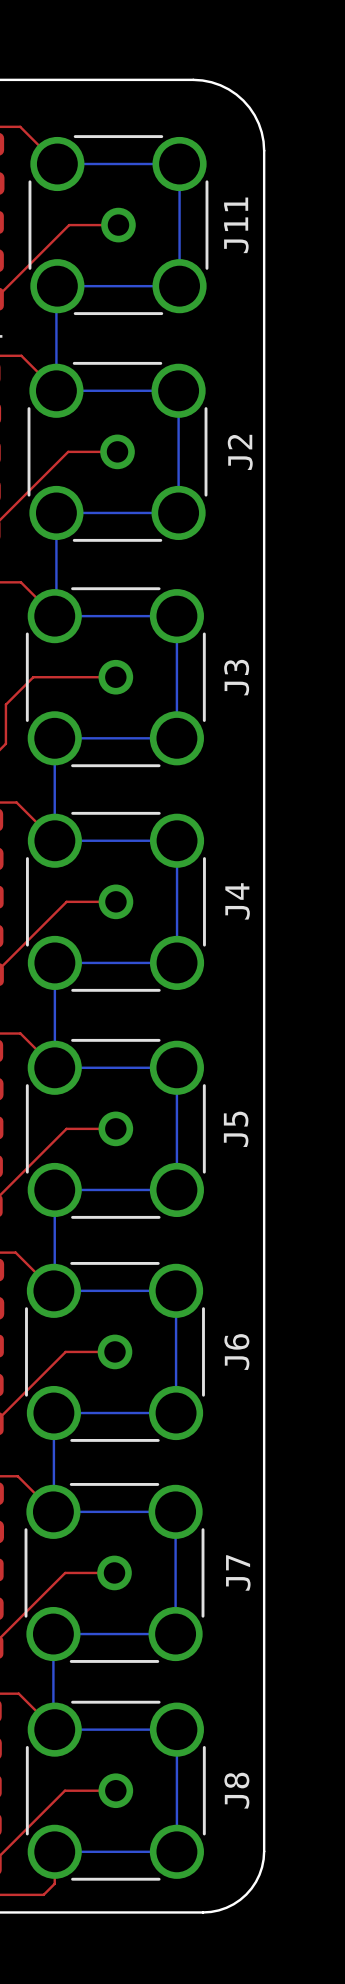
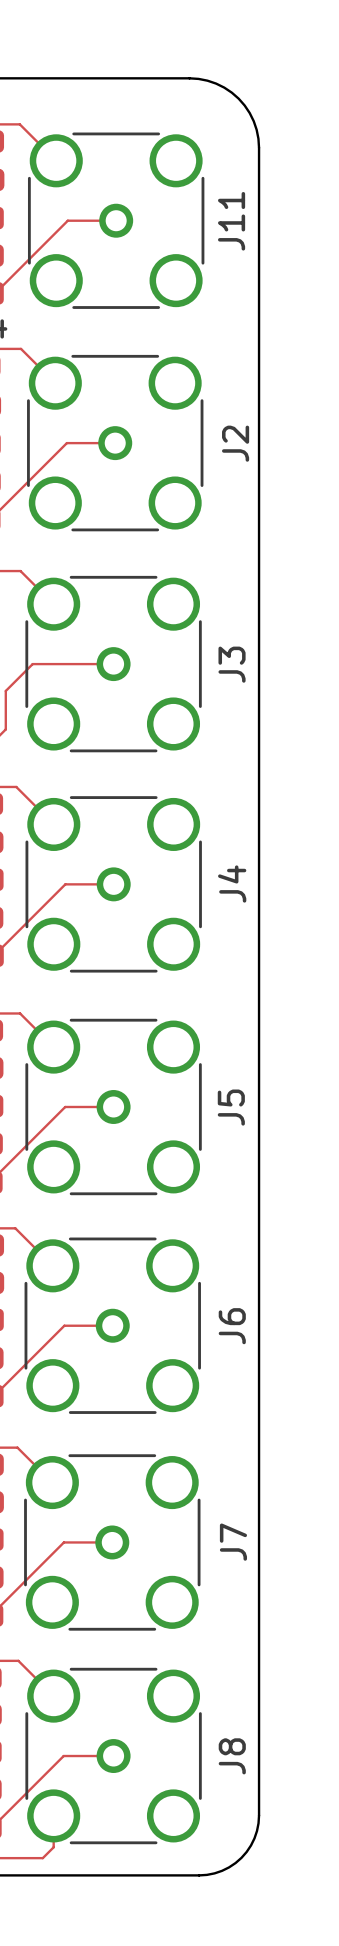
bottom track: (57, 163) (179, 163) (179, 286) (56, 287) (56, 390) (178, 390) (178, 512) (56, 512) (56, 614) (54, 616) (176, 616) (176, 738) (54, 738) (54, 840) -> none
bottom track: (54, 840) (177, 840) (177, 962) (54, 962) (54, 1067) -> none
bottom track: (54, 1067) (176, 1067) (176, 1189) (54, 1189) (53, 1290) (176, 1290) (176, 1413) (53, 1413) (53, 1511) (175, 1511) (175, 1634) (53, 1634) (53, 1728) (176, 1729) (176, 1851) (54, 1851) -> none

